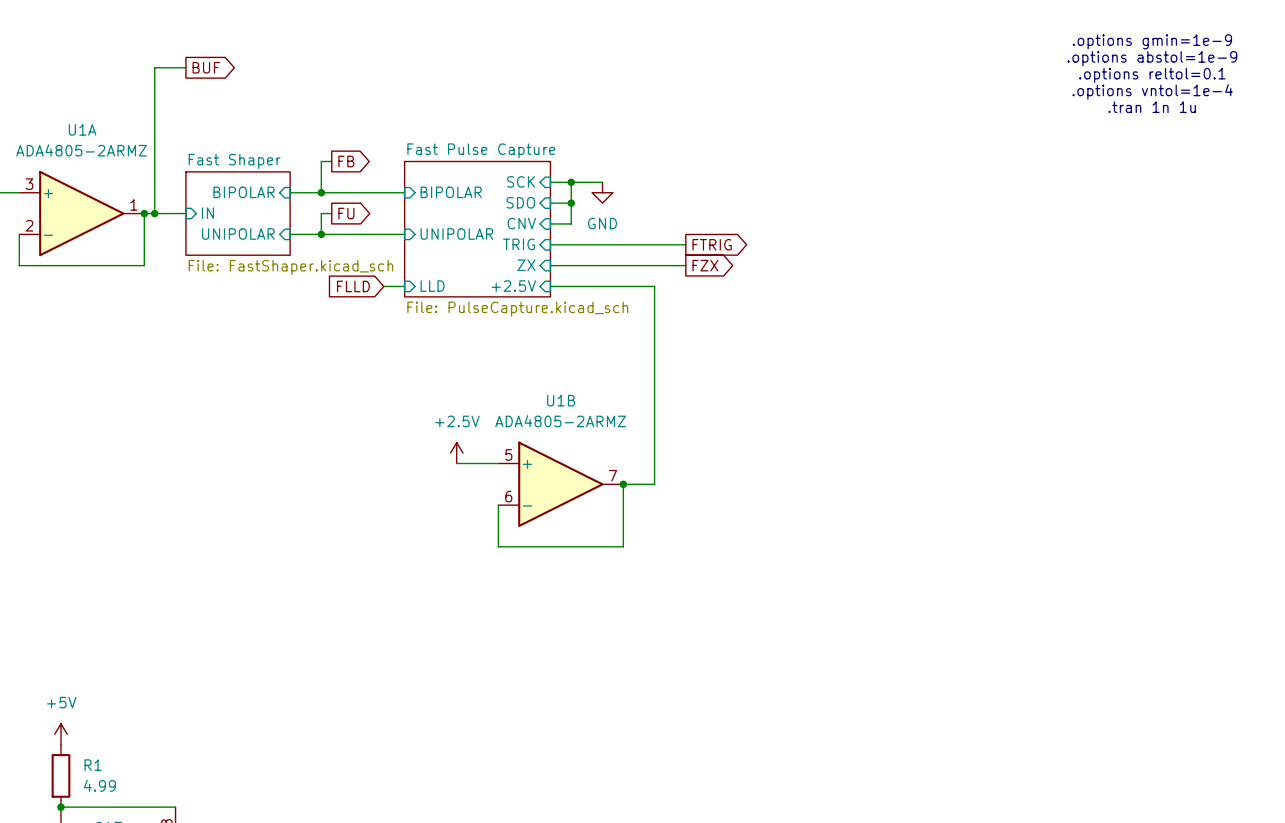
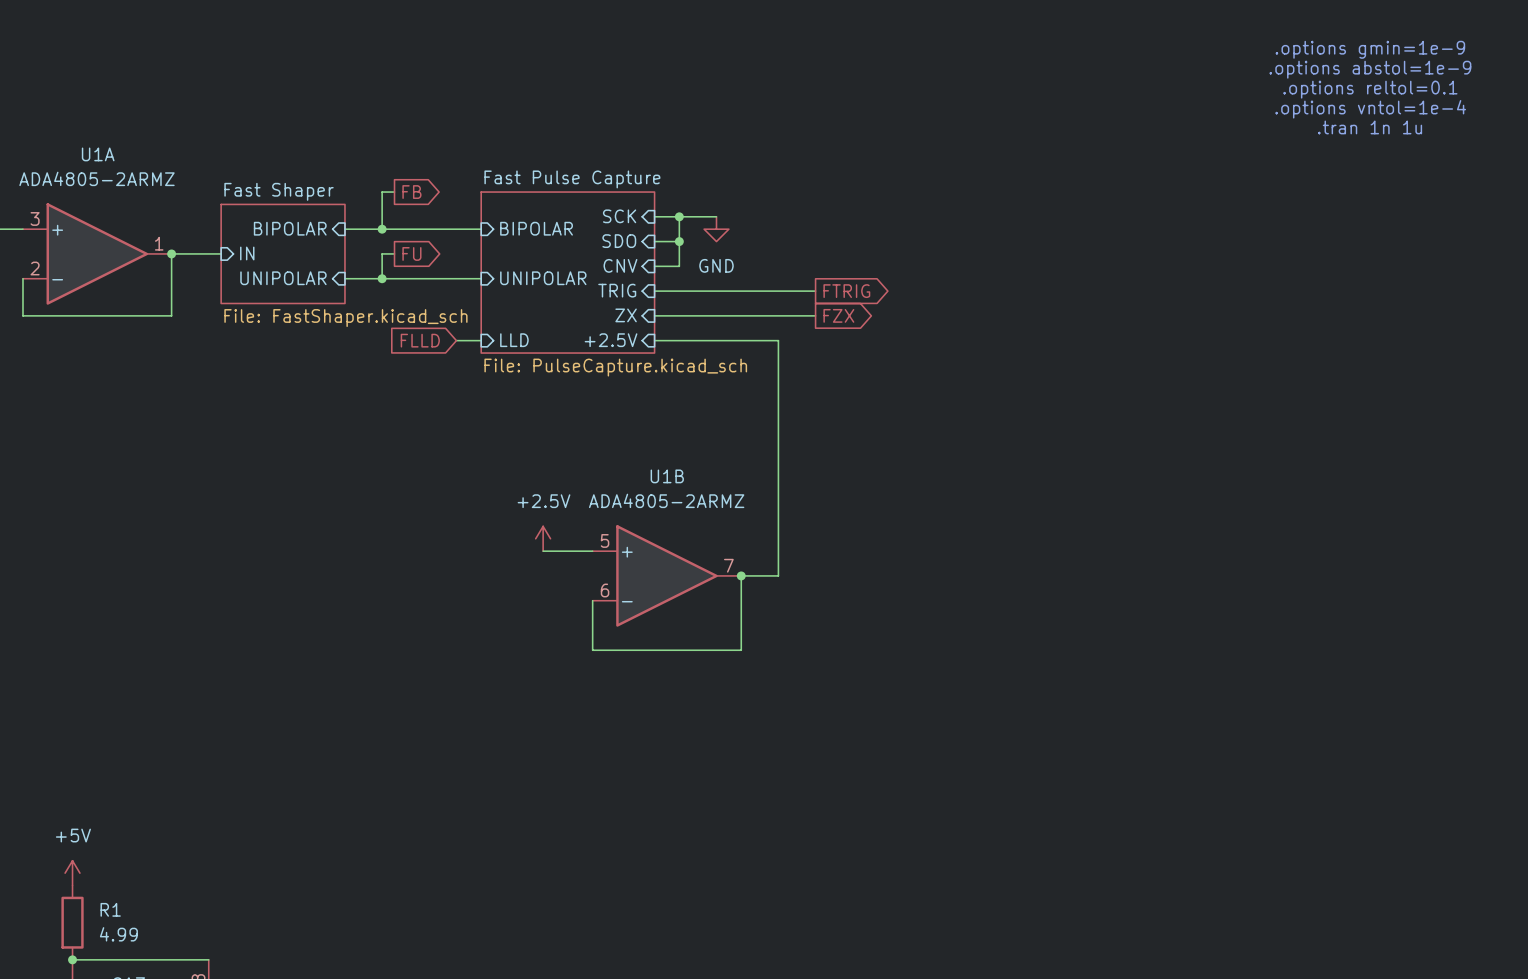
wire: (185, 67) (154, 67) (154, 213) -> none
global label: BUF (206, 67) -> none
junction: (154, 213) -> none

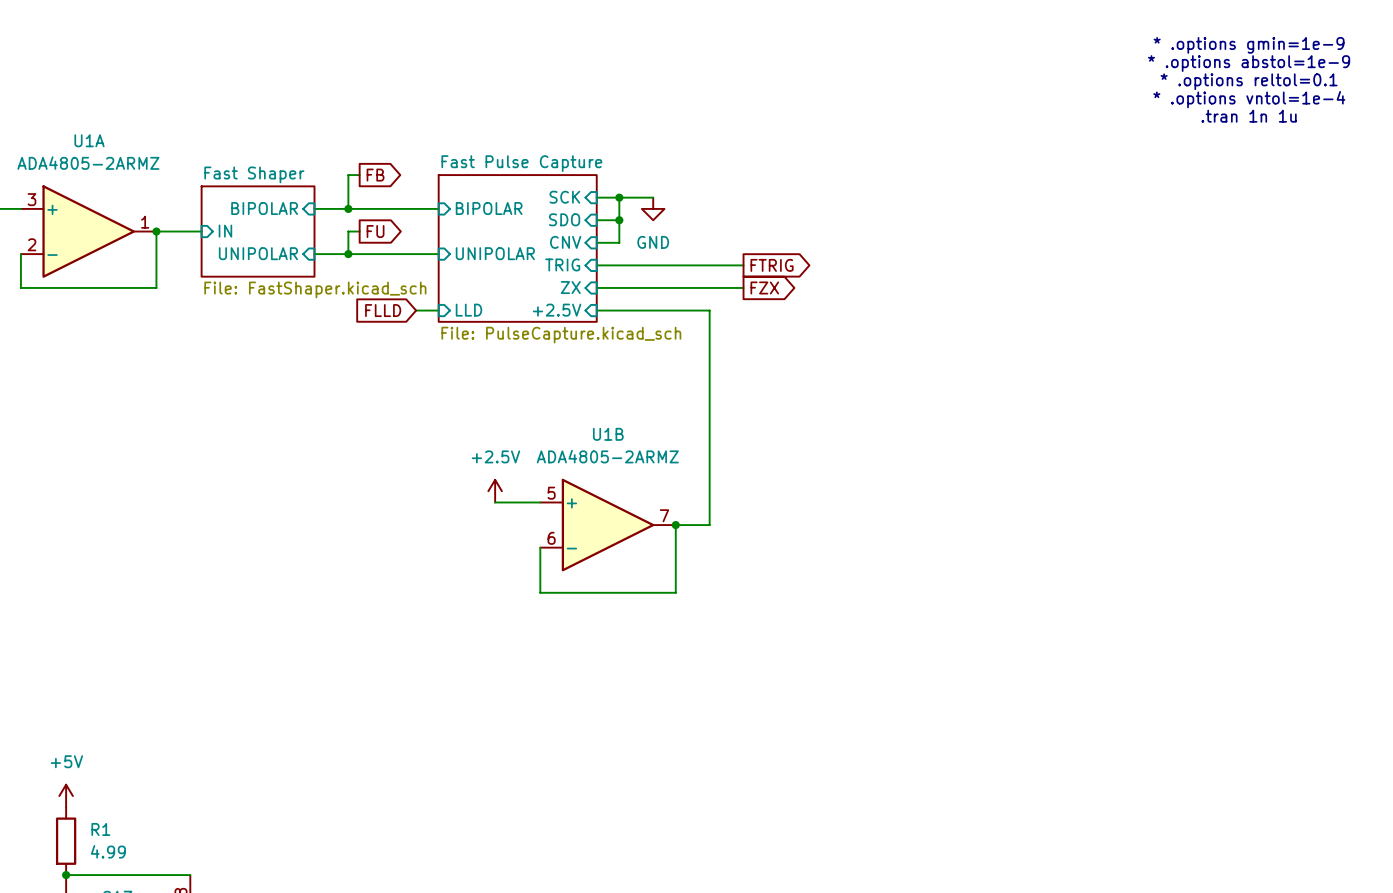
text: .options gmin=1e-9 (1370, 49) -> * .options gmin=1e-9 (1249, 45)
text: .options abstol=1e-9 (1370, 69) -> * .options abstol=1e-9 (1249, 63)
text: .options reltol=0.1 (1370, 89) -> * .options reltol=0.1 (1249, 81)
text: .options vntol=1e-4 (1370, 109) -> * .options vntol=1e-4 (1249, 99)

